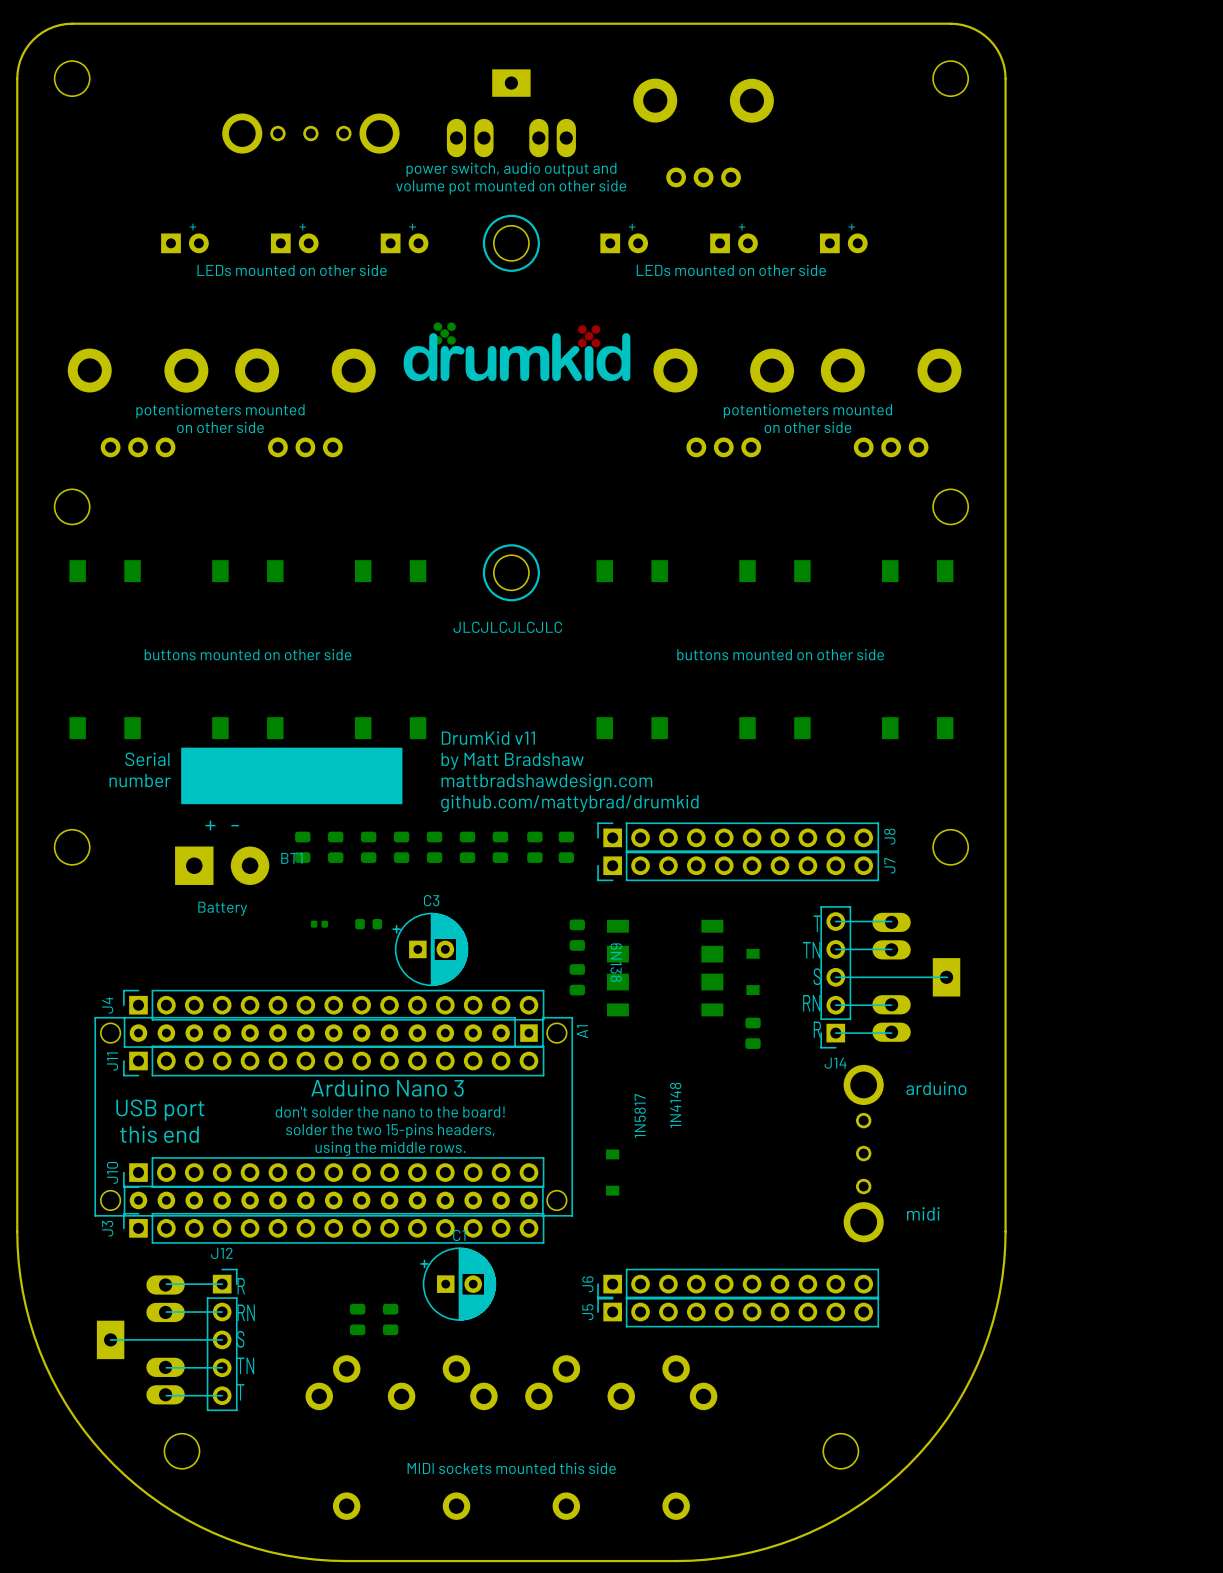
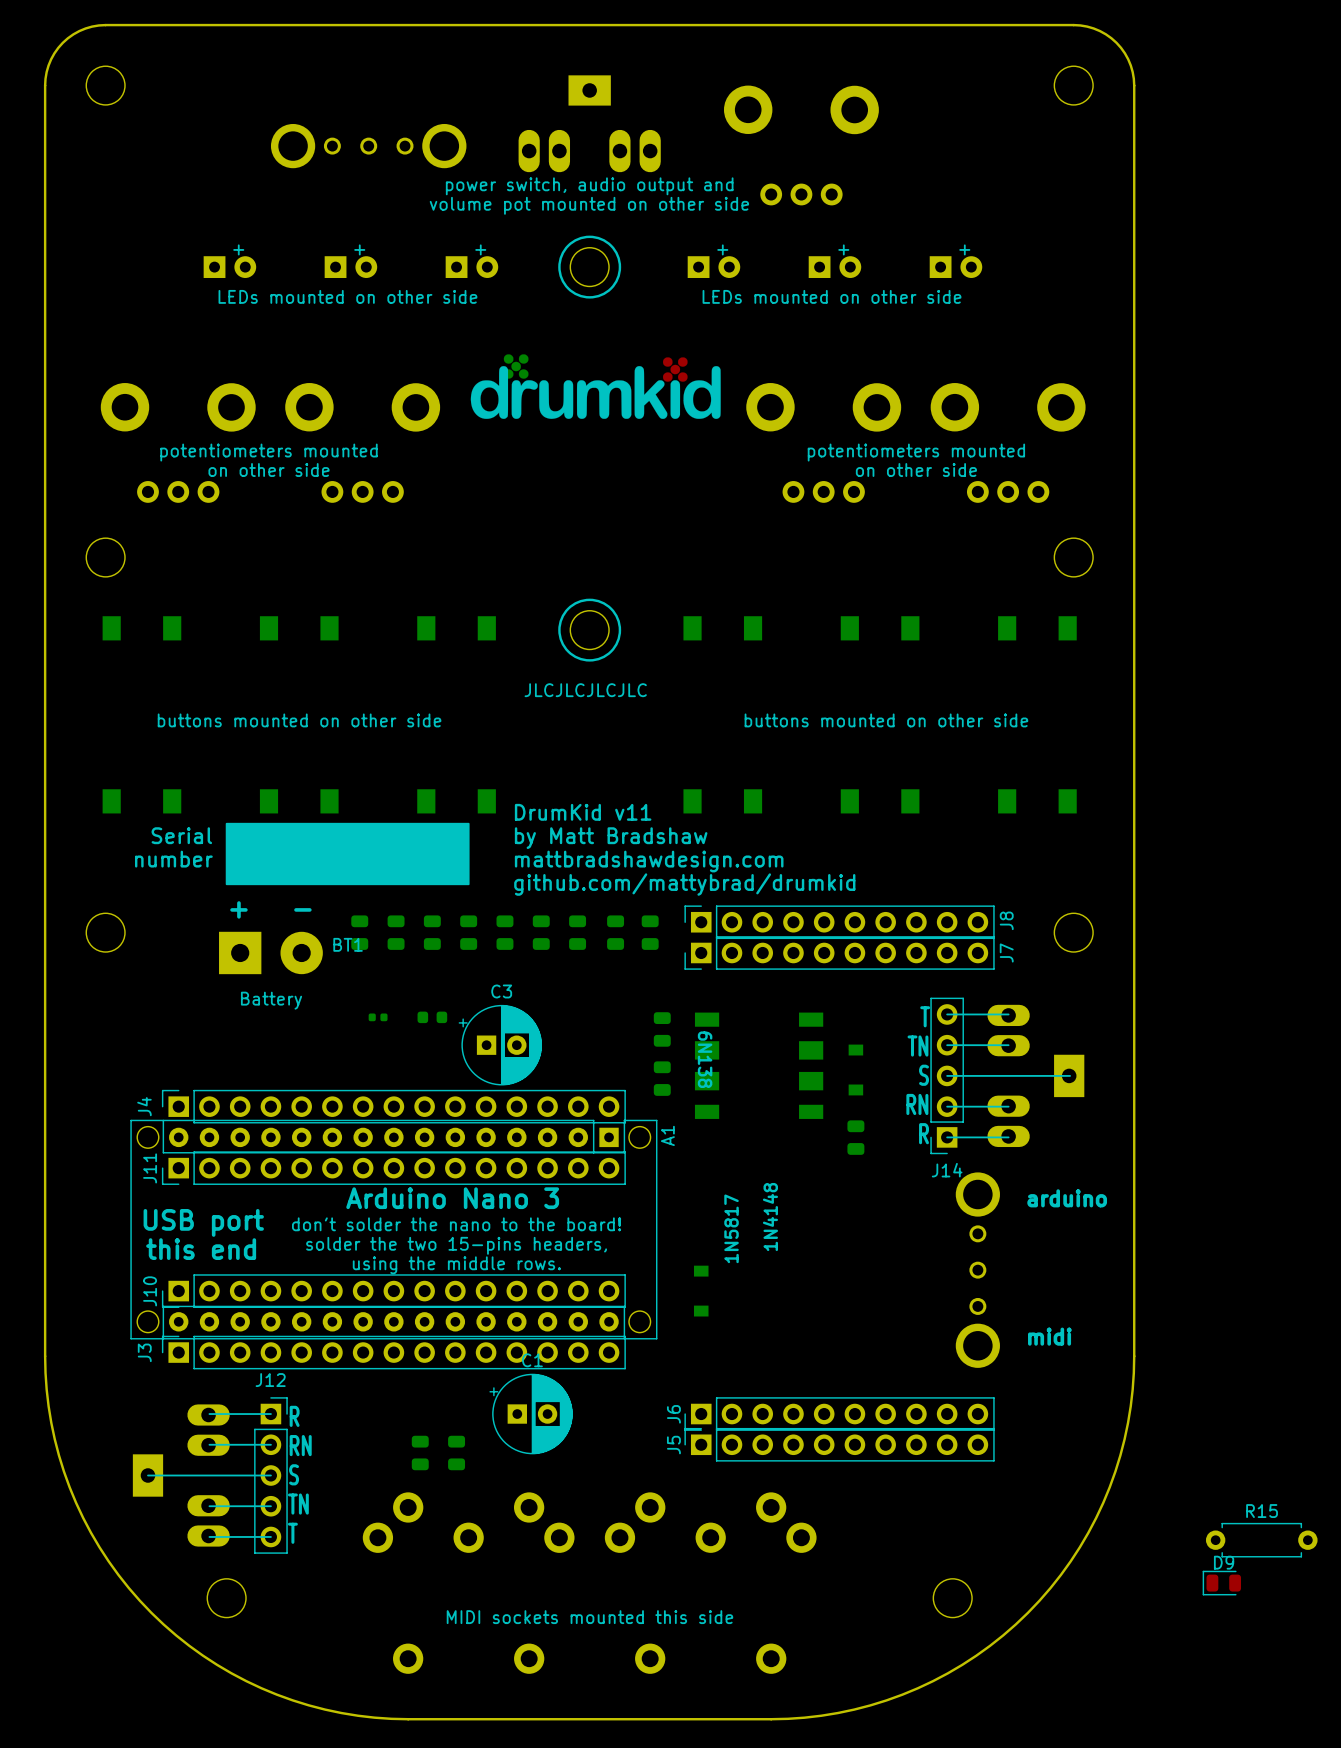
R15: none -> (1261, 1540)
D9: none -> (1221, 1583)

